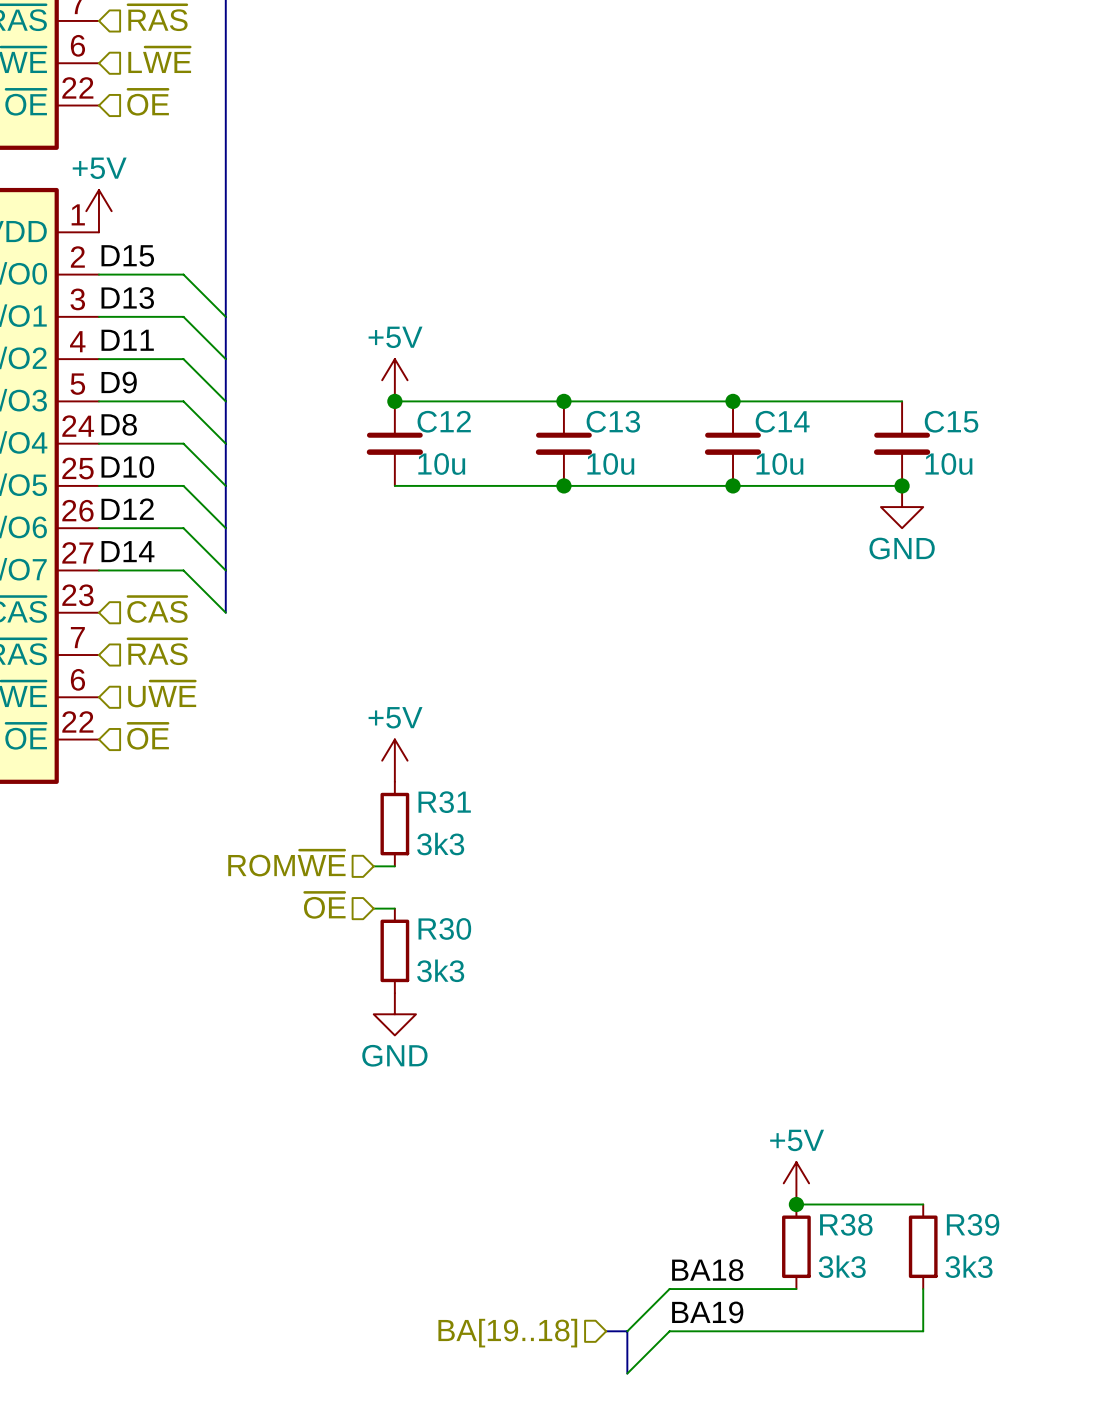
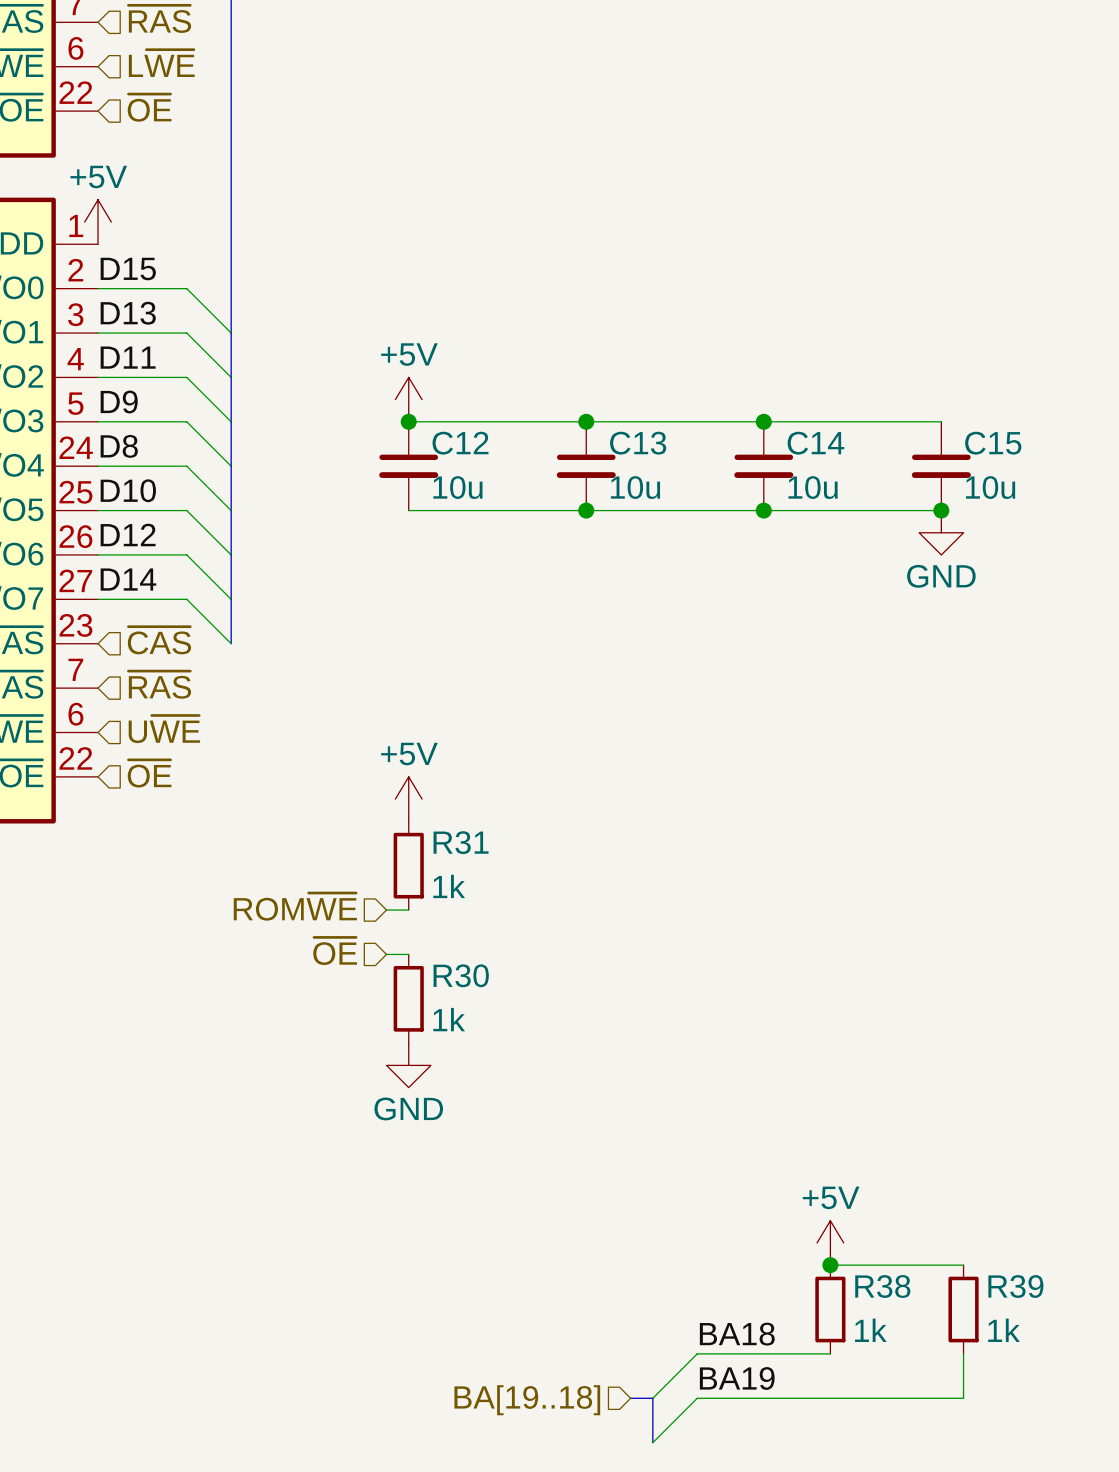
R31 value: 3k3 (440, 844) -> 1k (449, 886)
R30 value: 3k3 (440, 970) -> 1k (449, 1019)
R38 value: 3k3 (842, 1266) -> 1k (870, 1330)
R39 value: 3k3 (969, 1266) -> 1k (1004, 1330)

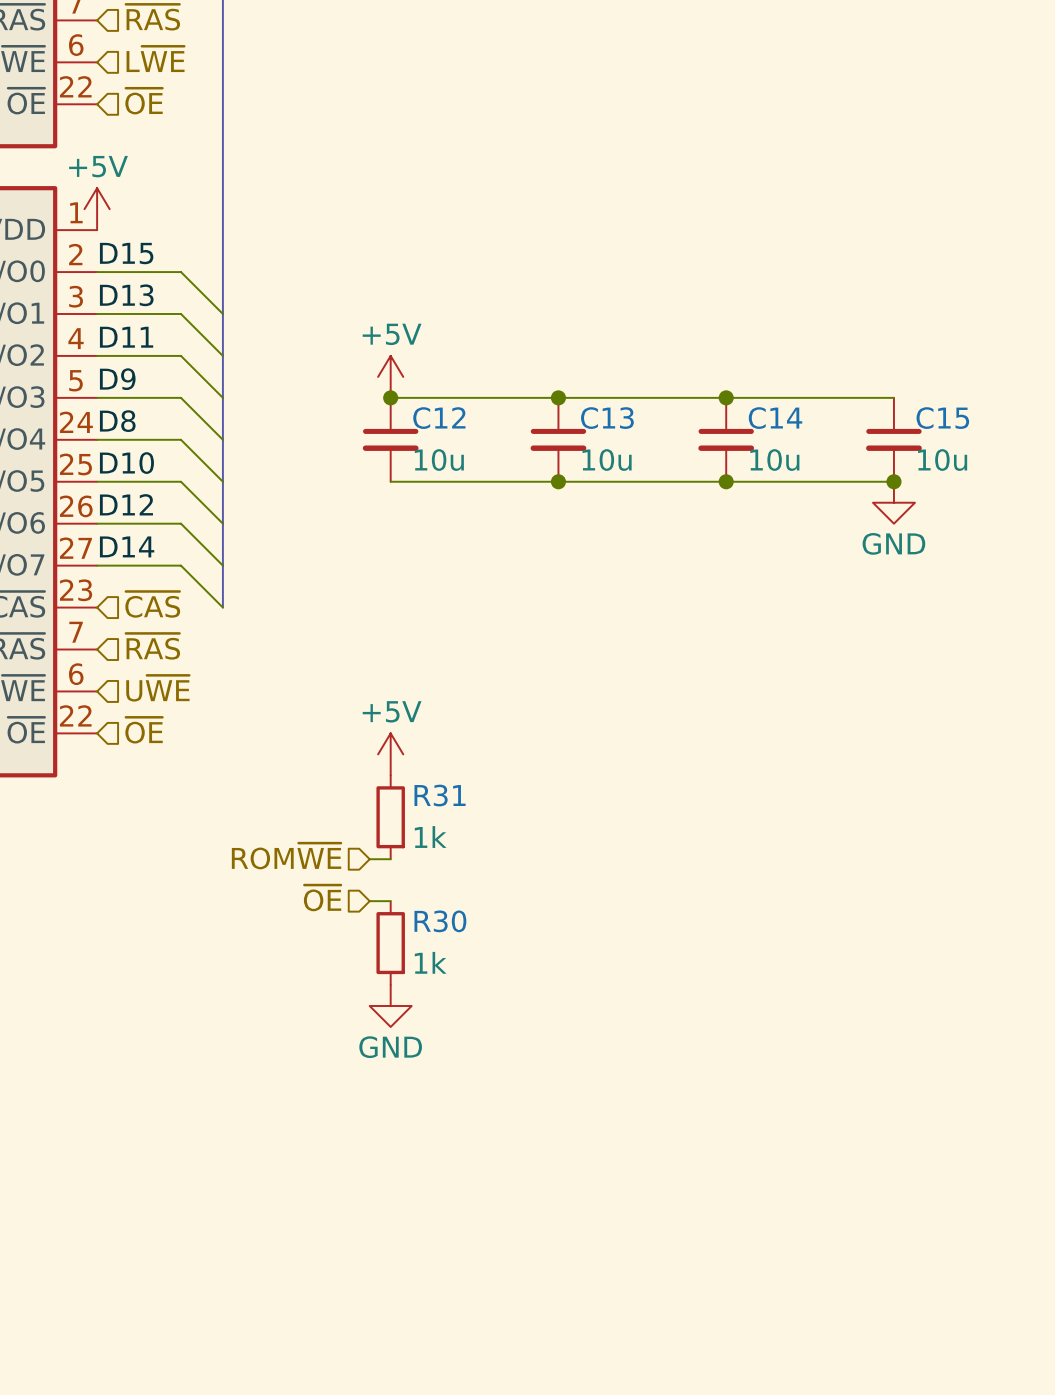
power symbol: +5V (830, 1242) -> none
wire: (830, 1265) (963, 1265) -> none
junction: (830, 1265) -> none
R38: 1k (830, 1309) -> none
R39: 1k (963, 1309) -> none
label: BA18 (737, 1334) -> none
wire: (830, 1353) (697, 1353) (652, 1398) -> none
wire: (963, 1353) (963, 1398) (697, 1398) (652, 1442) -> none
label: BA19 (737, 1378) -> none
bus: (630, 1398) (652, 1398) (652, 1442) -> none
hierarchical label: BA[19..18] (527, 1400) -> none

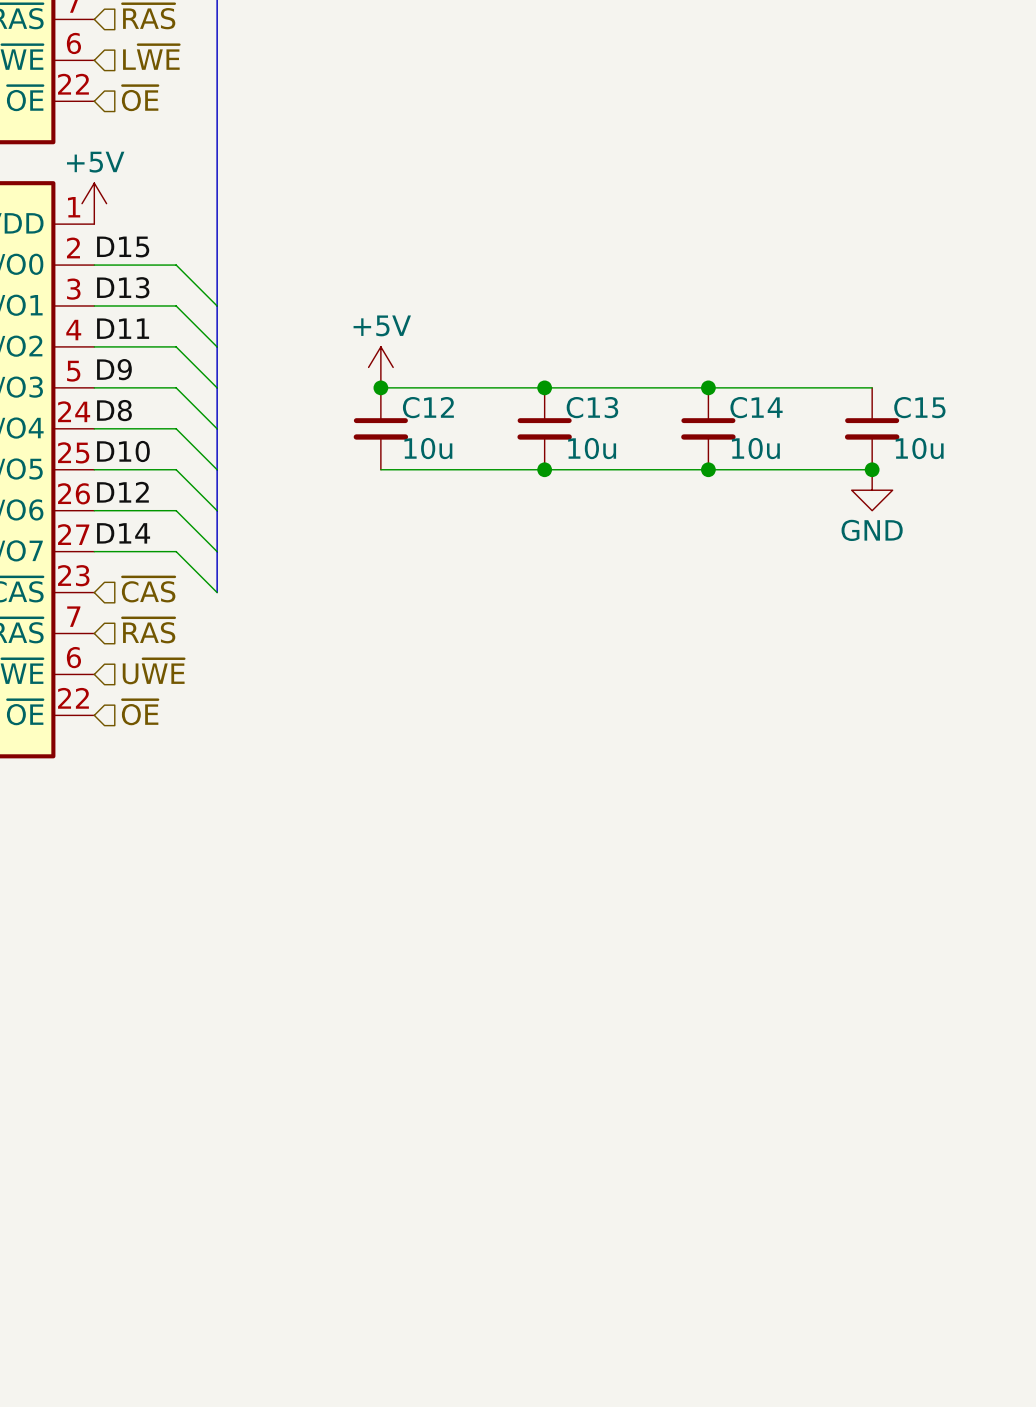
power symbol: +5V (390, 754) -> none
R31: 1k (390, 817) -> none
hierarchical label: ROM~{WE} (286, 856) -> none
wire: (369, 859) (390, 859) -> none
hierarchical label: ~{OE} (322, 898) -> none
wire: (369, 901) (390, 901) -> none
R30: 1k (390, 943) -> none
power symbol: GND (390, 1006) -> none

